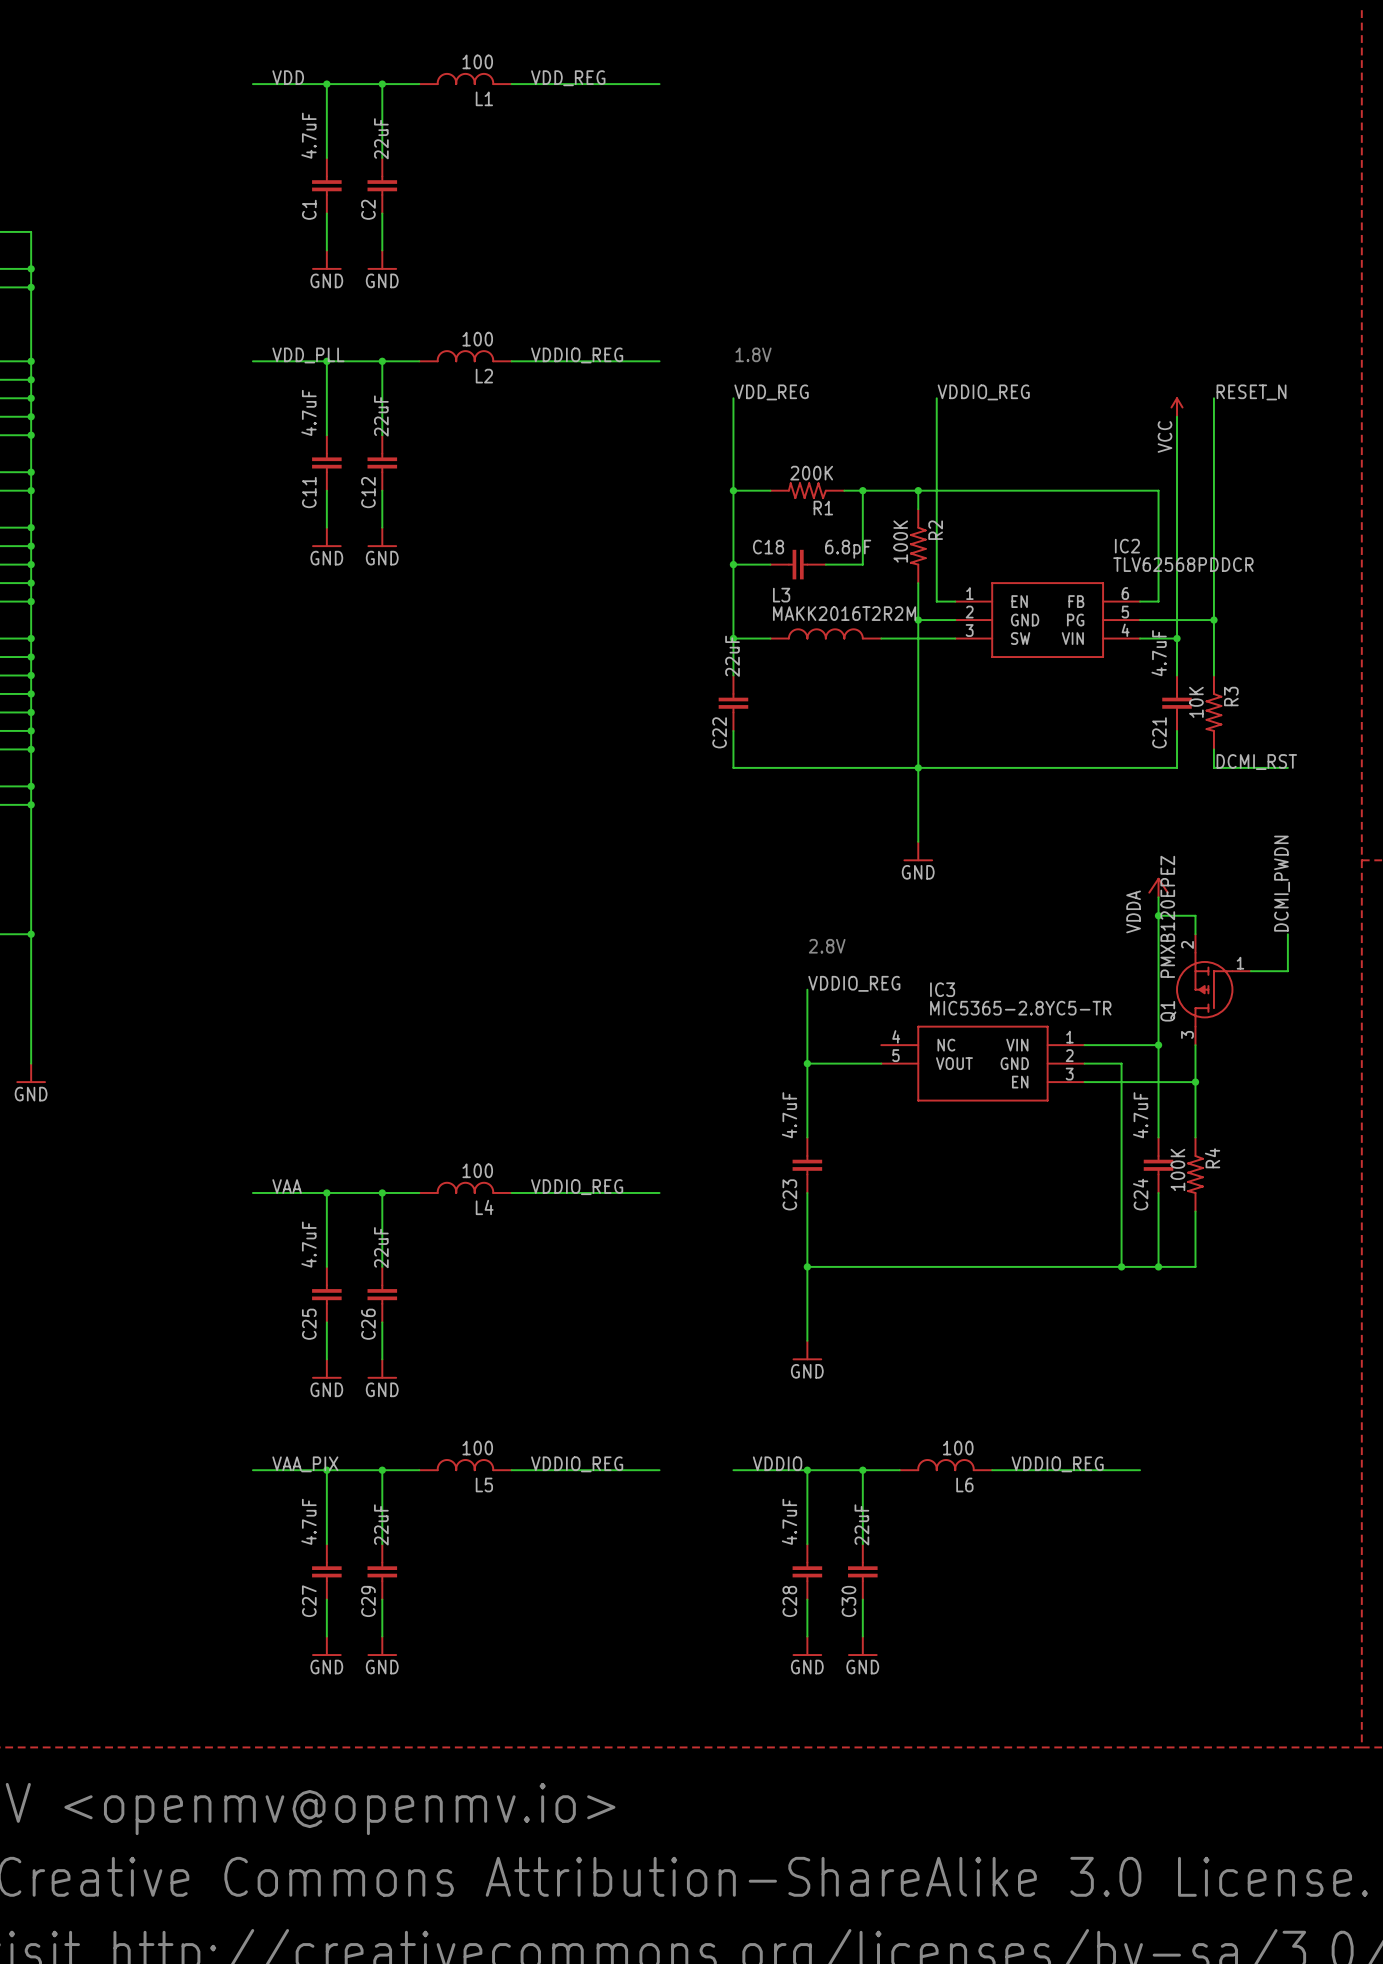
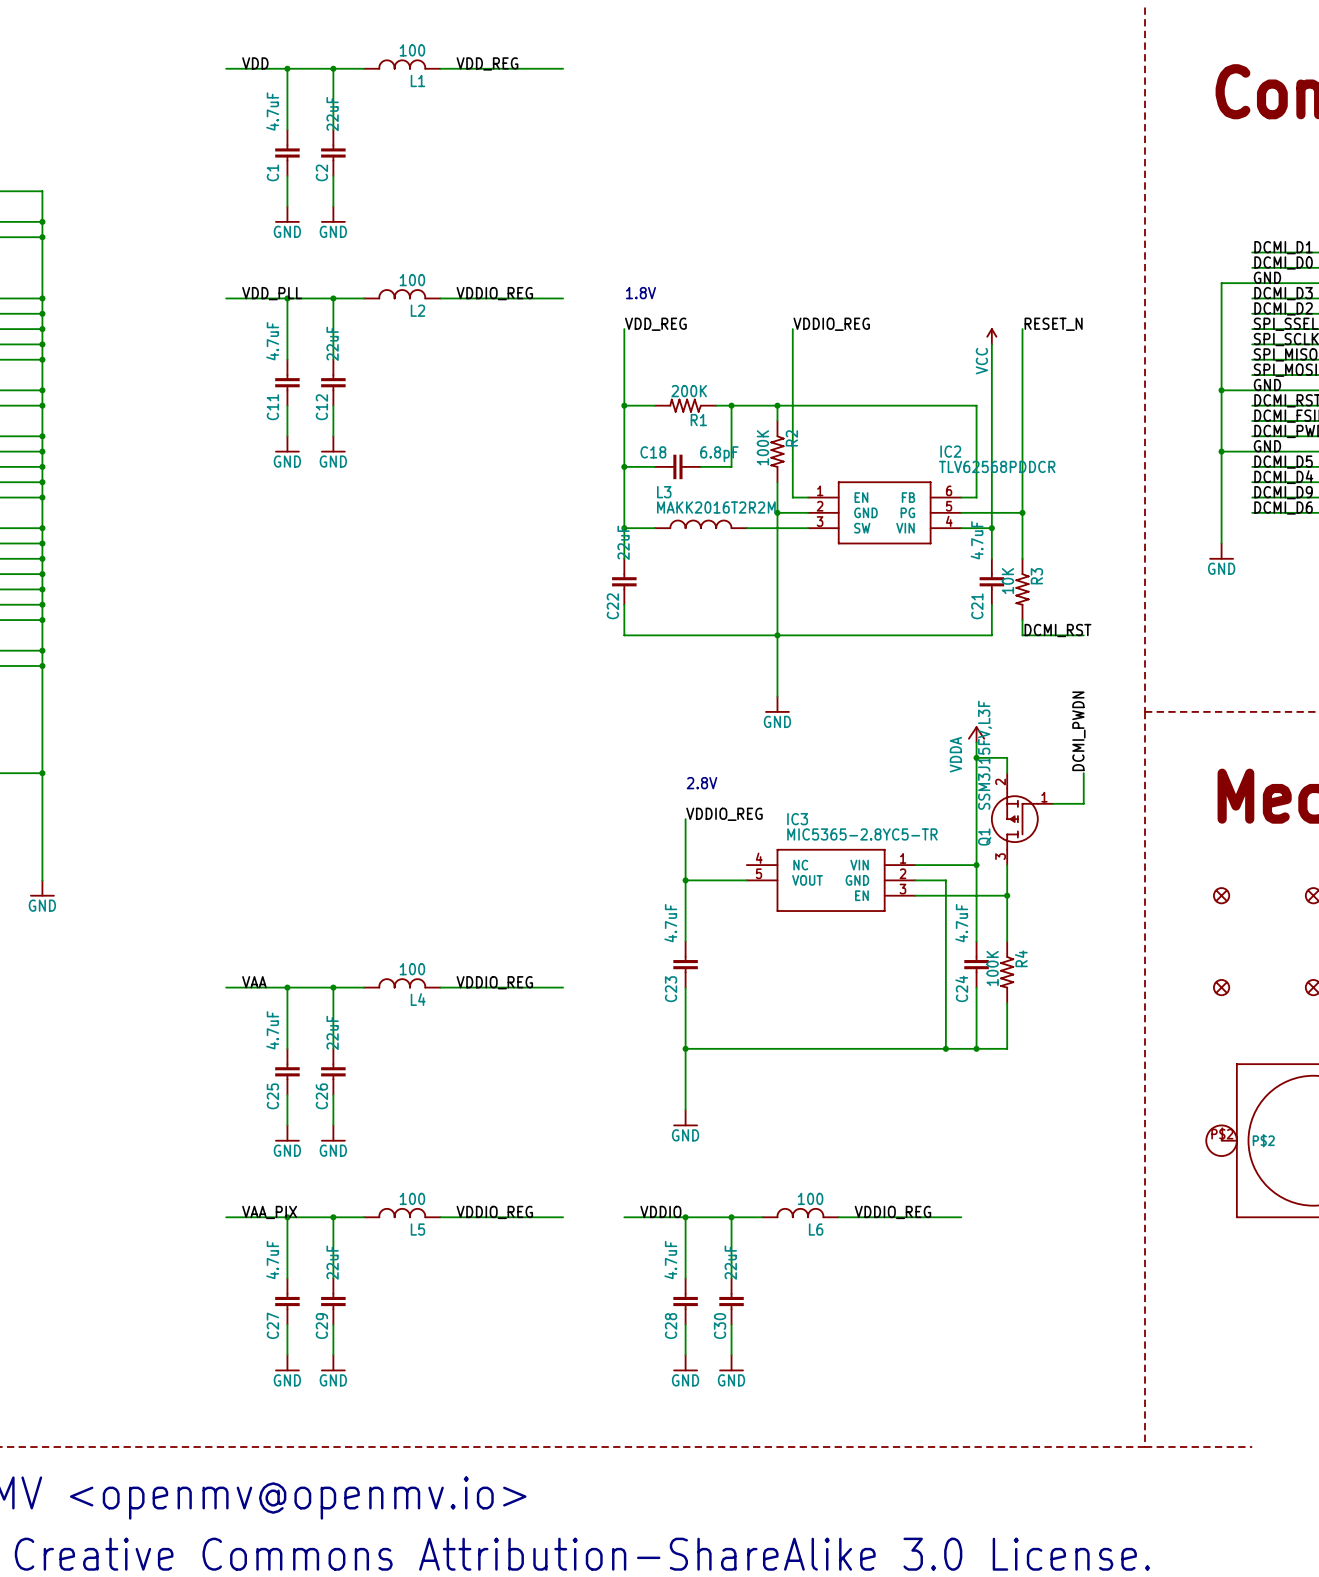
Q1 value: PMXB120EPEZ (1167, 916) -> SSM3J15FV,L3F (984, 755)

